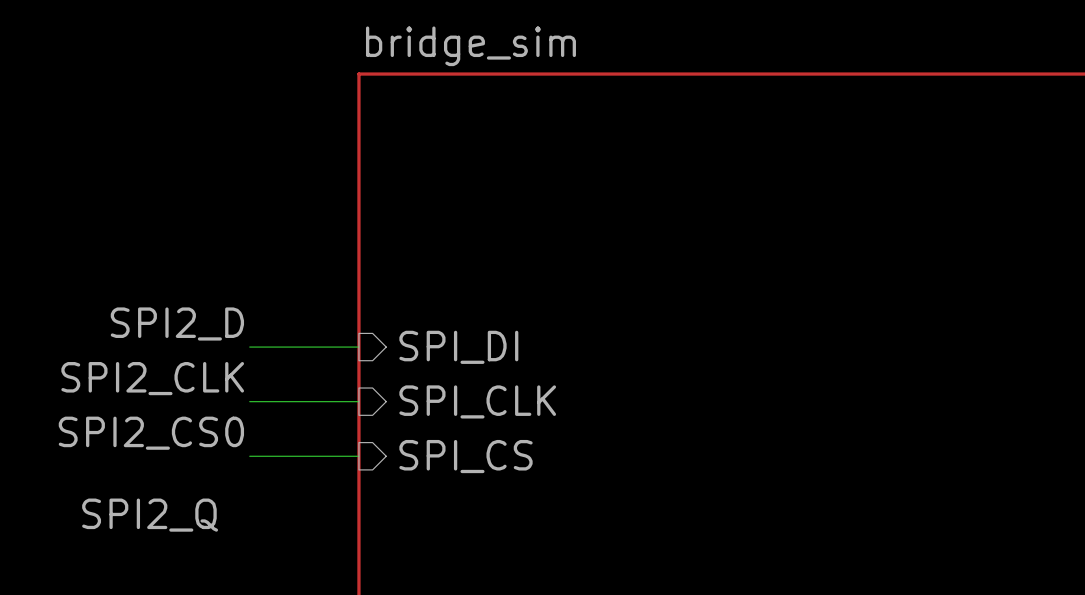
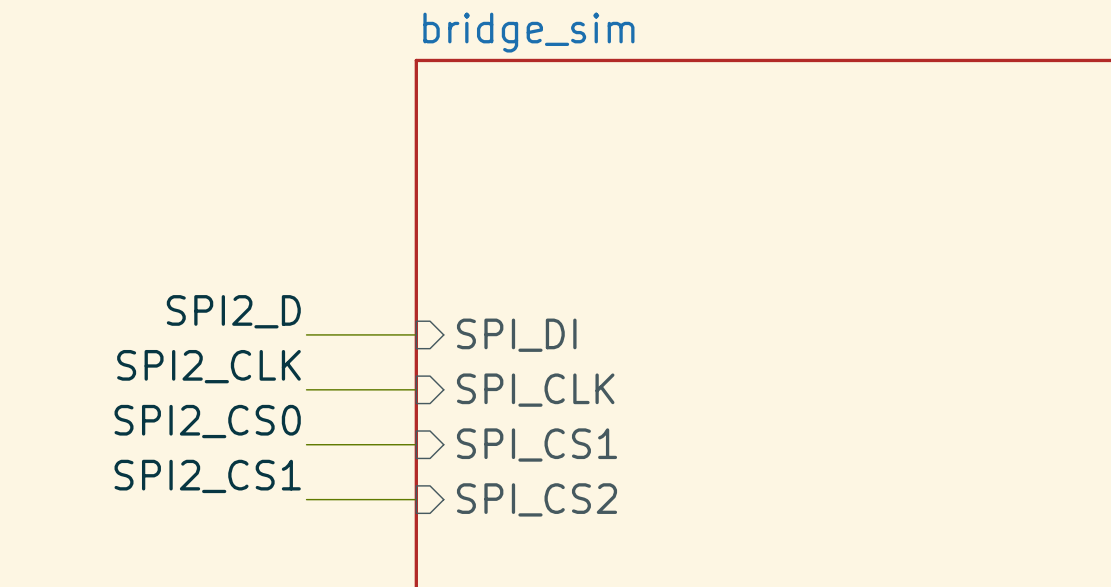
sheet pin: SPI_CS (465, 456) -> SPI_CS1 (537, 445)
wire: none -> (306, 499) (416, 499)
sheet pin: none -> SPI_CS2 (537, 499)
label: SPI2_Q (150, 515) -> SPI2_CS1 (207, 476)

